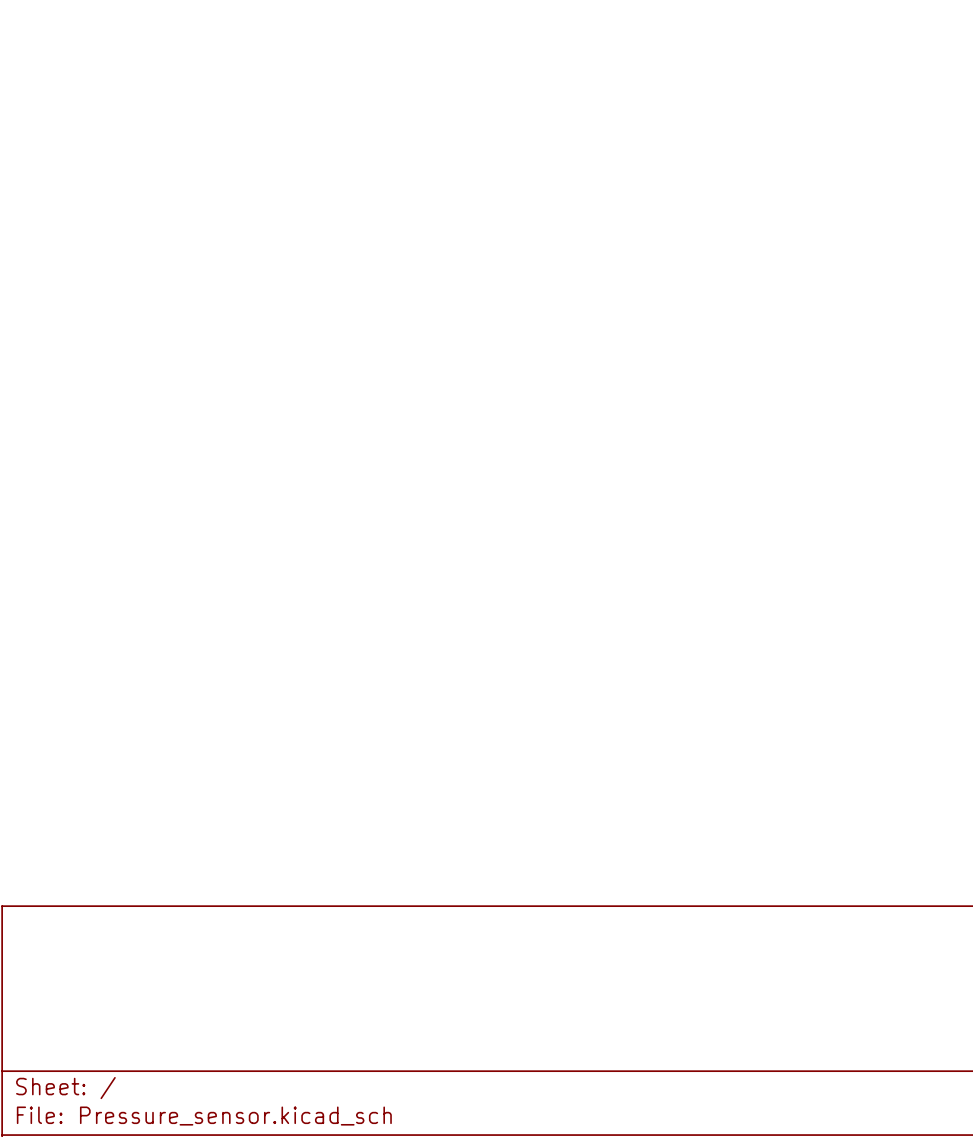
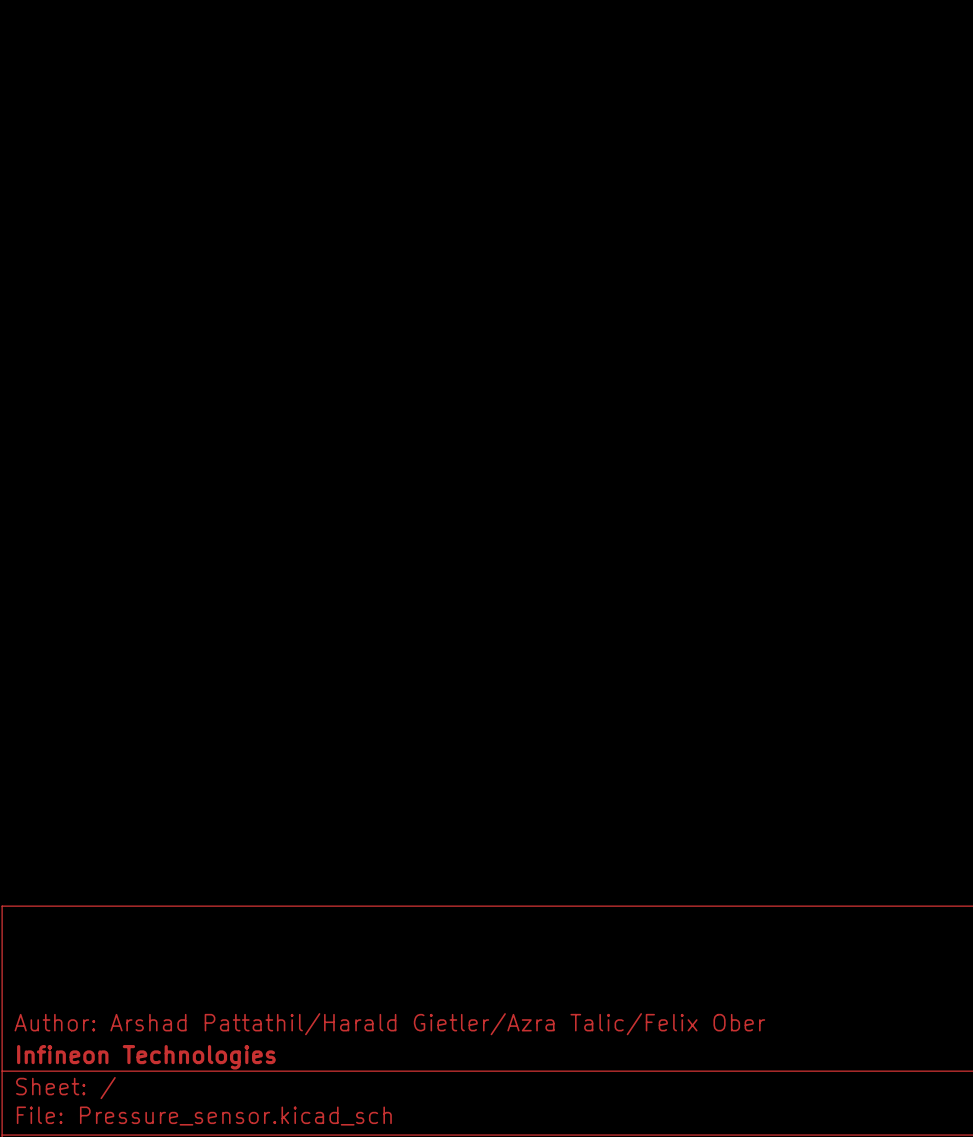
title block: none -> Author: Arshad Pattathil/Harald Gietler/Azra Talic/Felix Ober (389, 1024)
title block: none -> Infineon Technologies (146, 1057)

